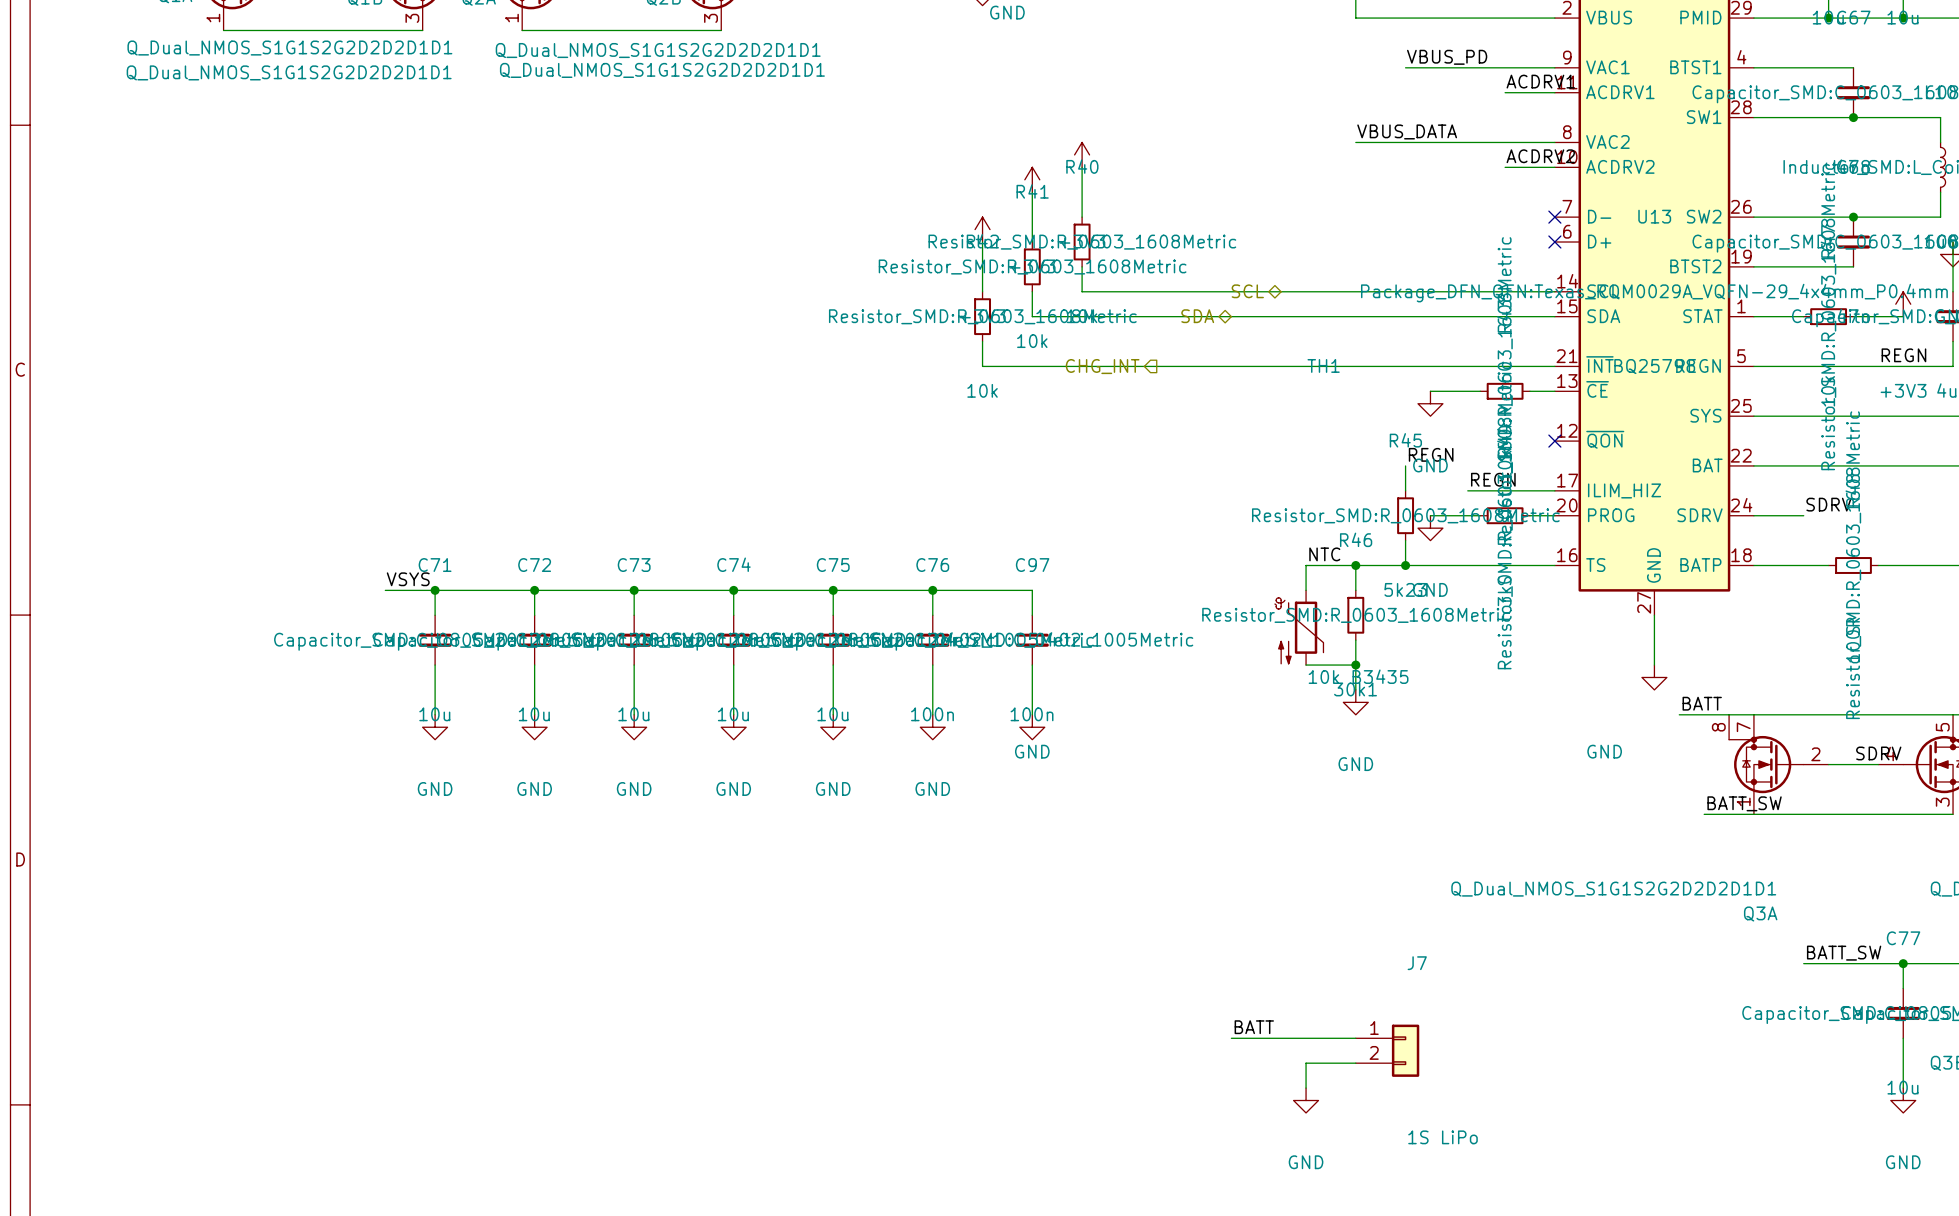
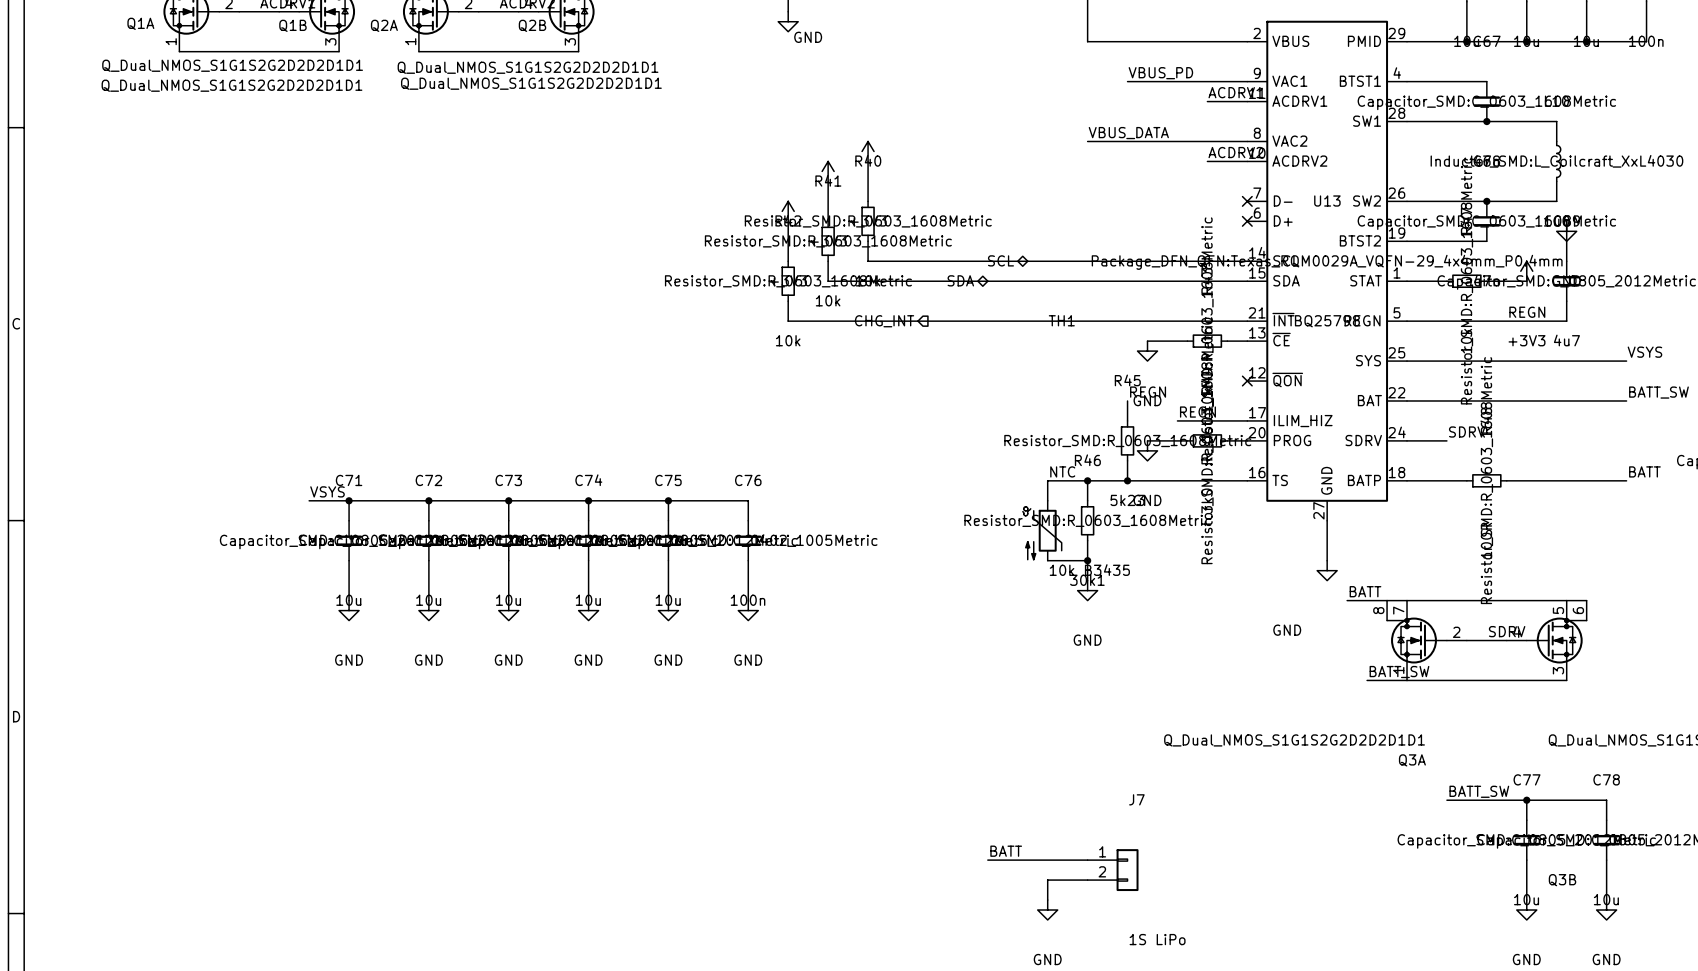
wire: (932, 590) (1032, 590) (1032, 615) -> none
junction: (932, 590) -> none
C97: 100n (1032, 640) -> none
wire: (1032, 665) (1032, 714) -> none
power symbol: GND (1032, 727) -> none

